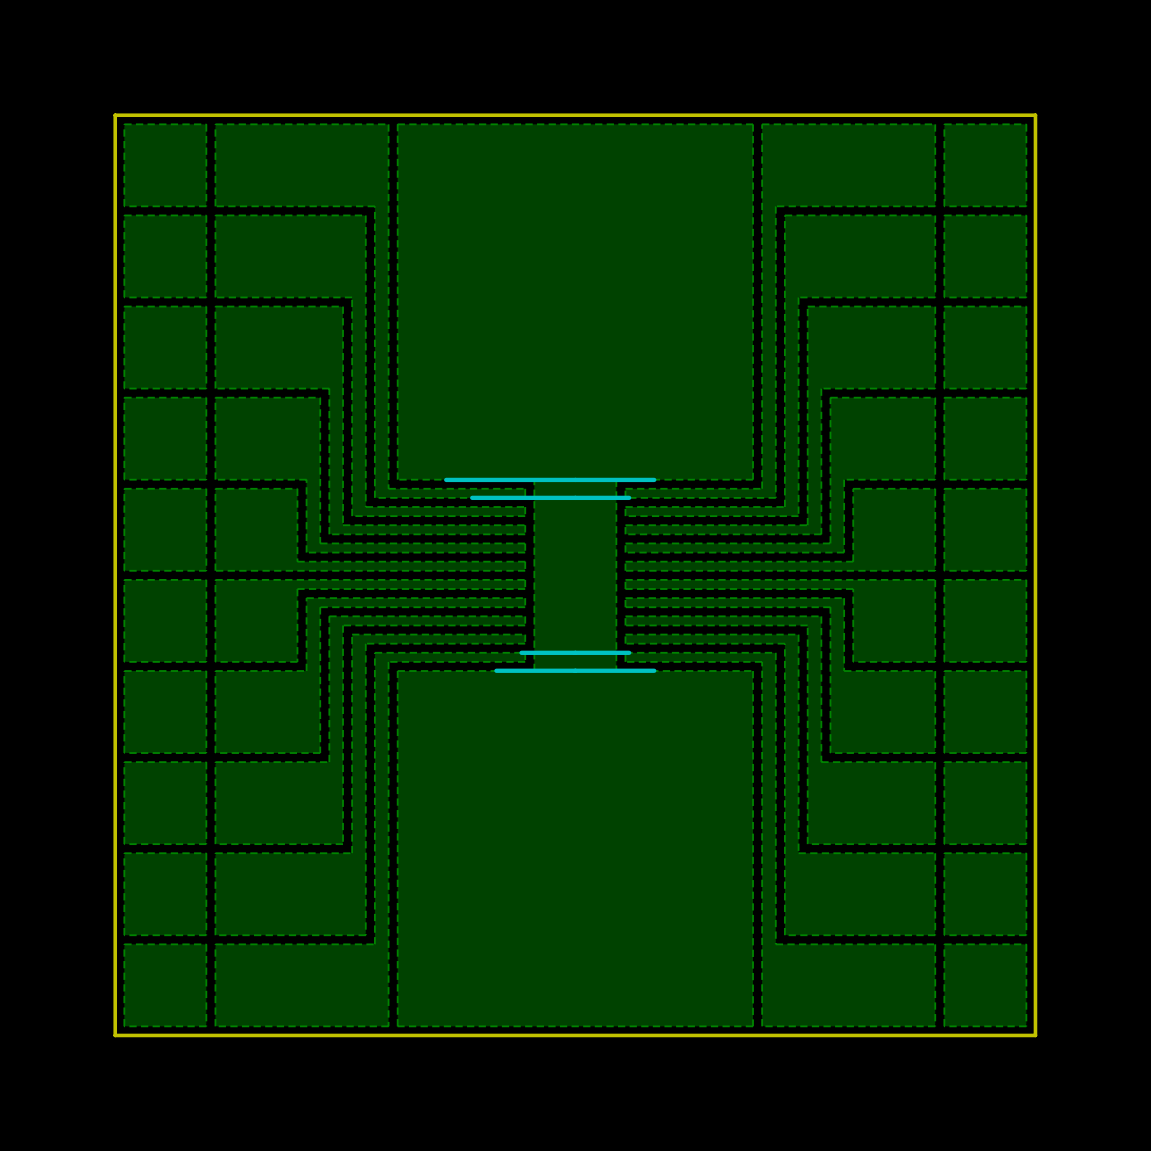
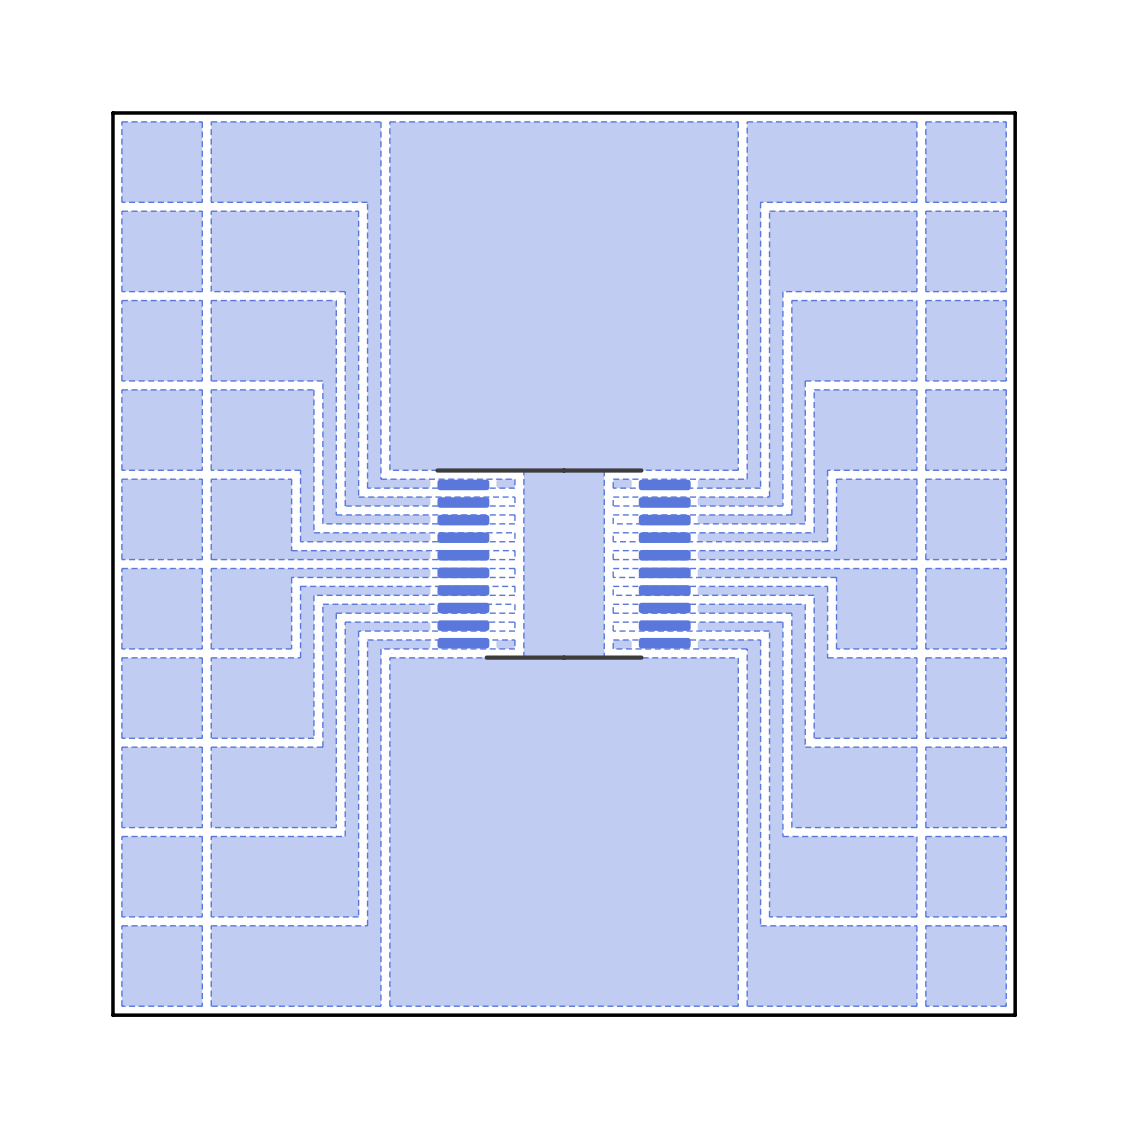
drawing: [444, 477, 657, 673] -> none
part: none -> (563, 564)

